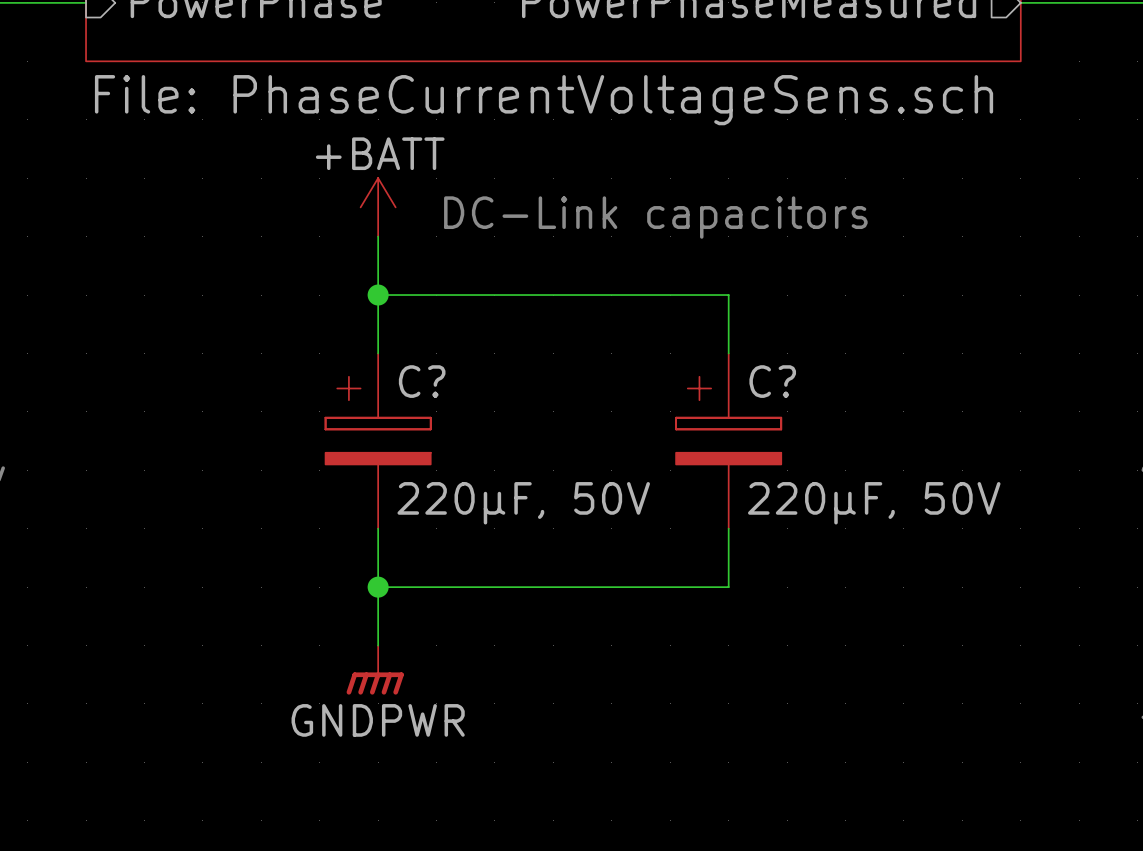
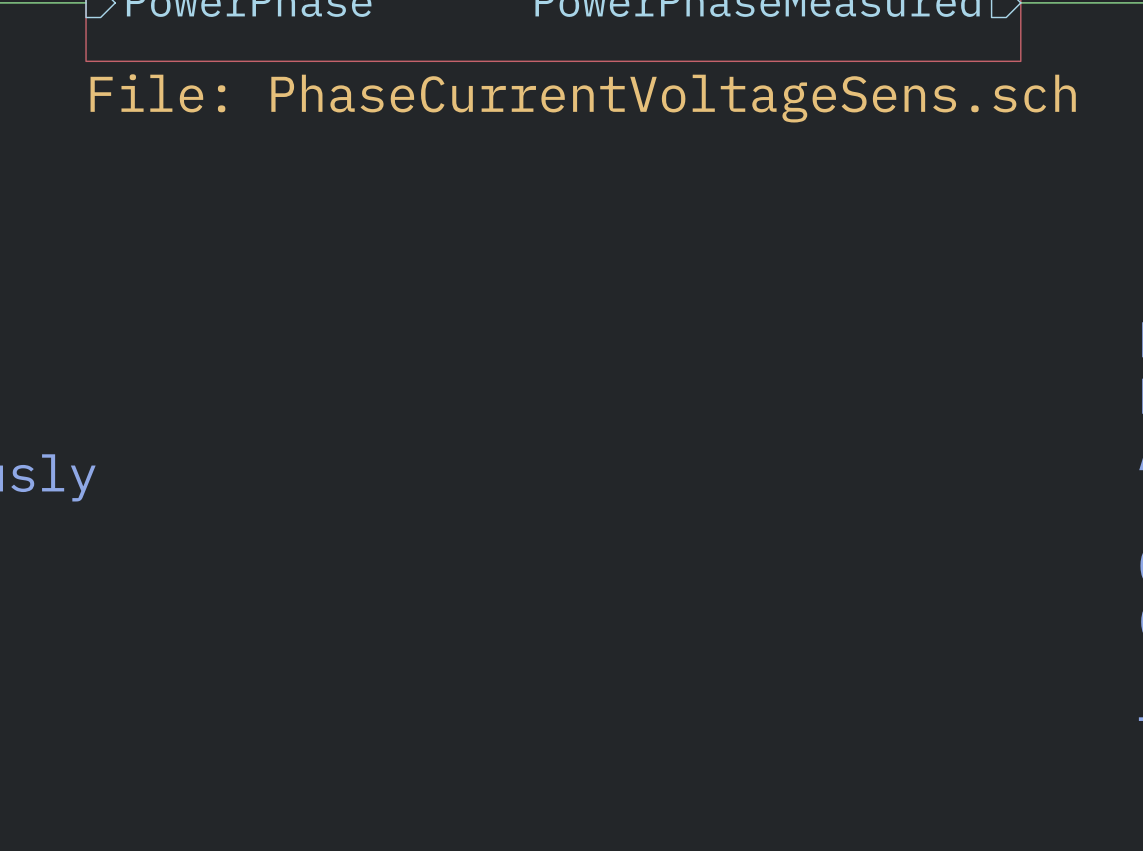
power symbol: +BATT (378, 207) -> none
text: DC-Link capacitors (655, 217) -> none
wire: (378, 236) (378, 353) -> none
wire: (378, 295) (728, 295) (728, 353) -> none
junction: (378, 295) -> none
C?: 220μF, 50V (378, 441) -> none
C?: 220μF, 50V (728, 441) -> none
wire: (378, 528) (378, 645) -> none
wire: (728, 528) (728, 587) (378, 587) -> none
junction: (378, 587) -> none
power symbol: GNDPWR (375, 670) -> none

